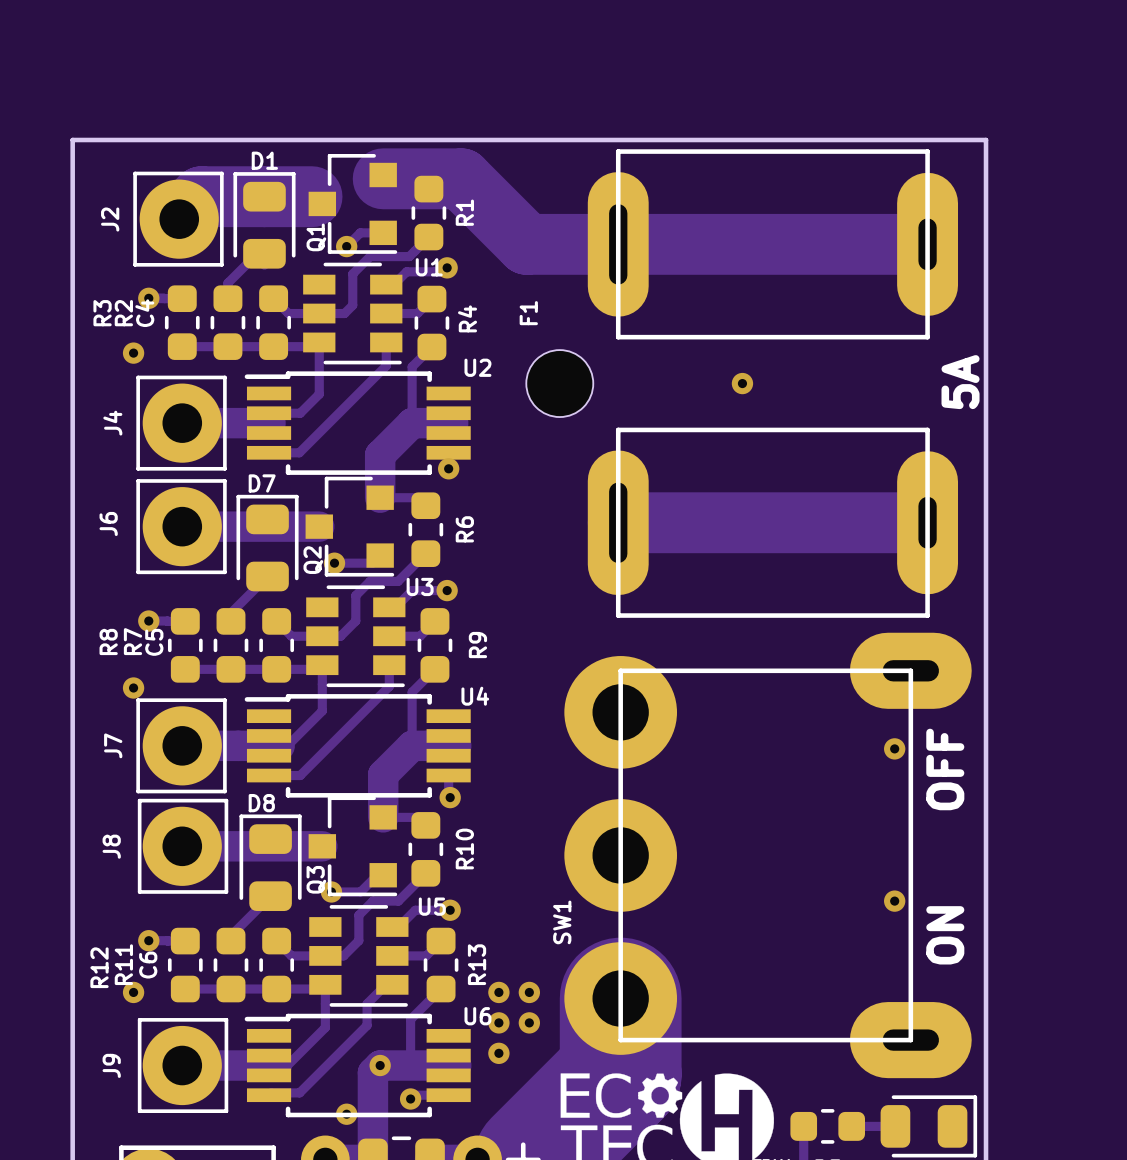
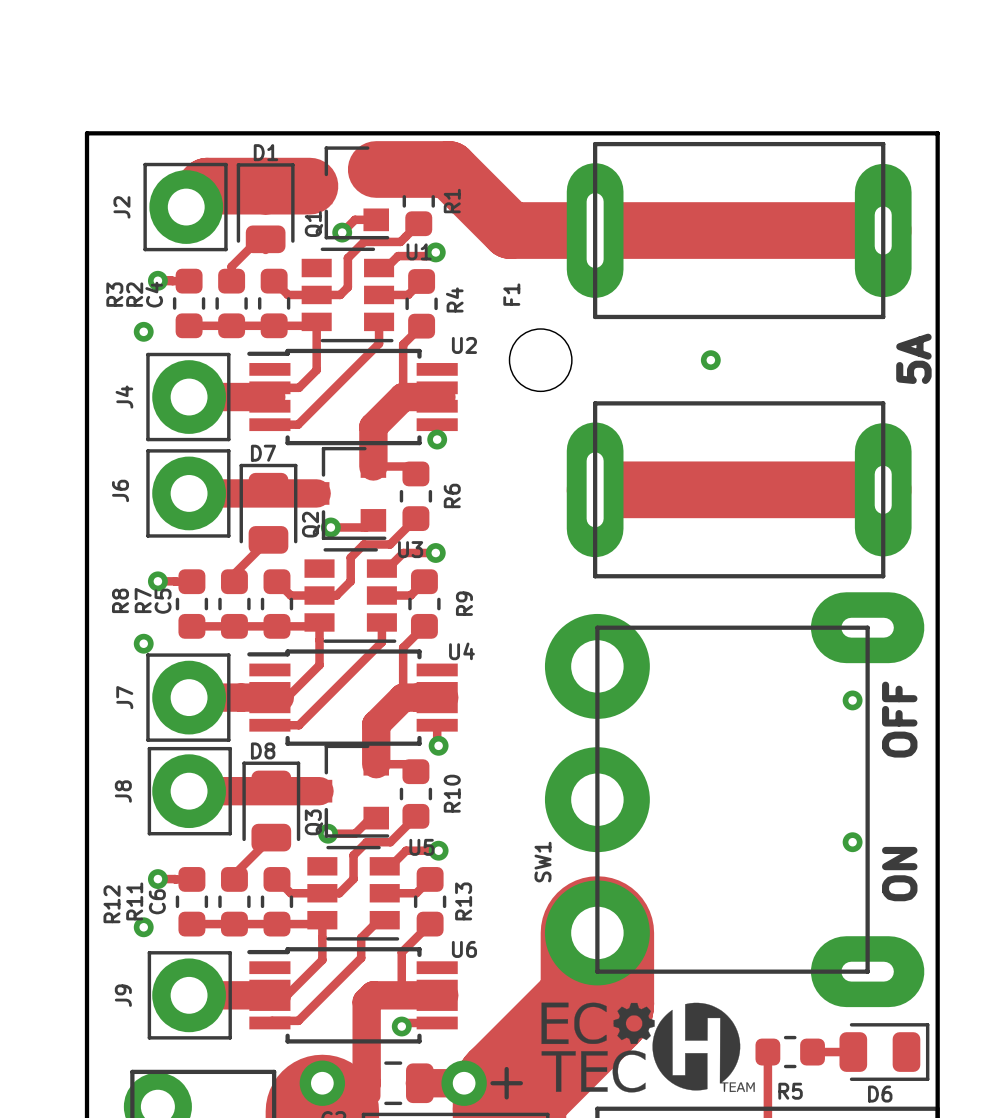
via: (498, 992) -> none
via: (529, 992) -> none
via: (498, 1022) -> none
via: (529, 1022) -> none
via: (498, 1053) -> none
via: (380, 1065) -> none
via: (346, 1114) -> none

